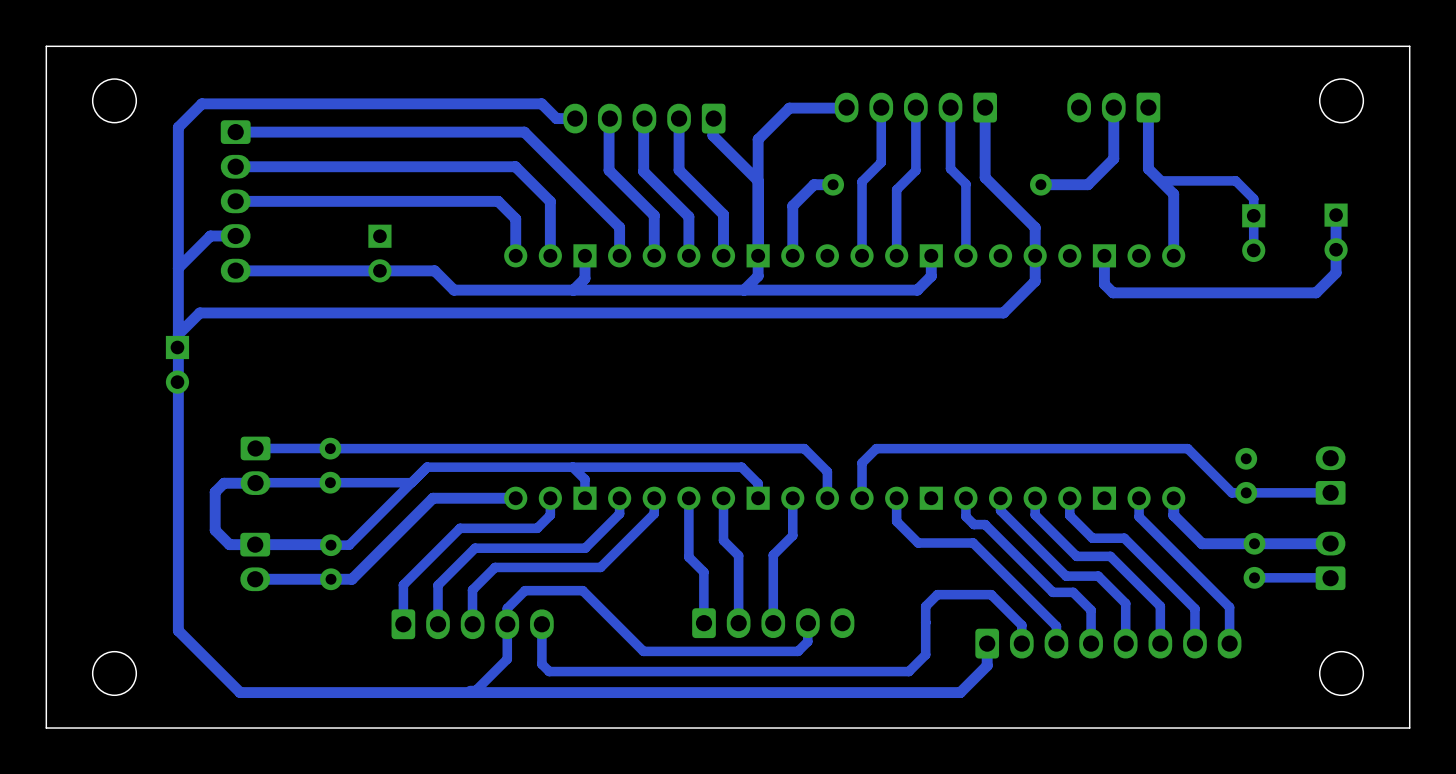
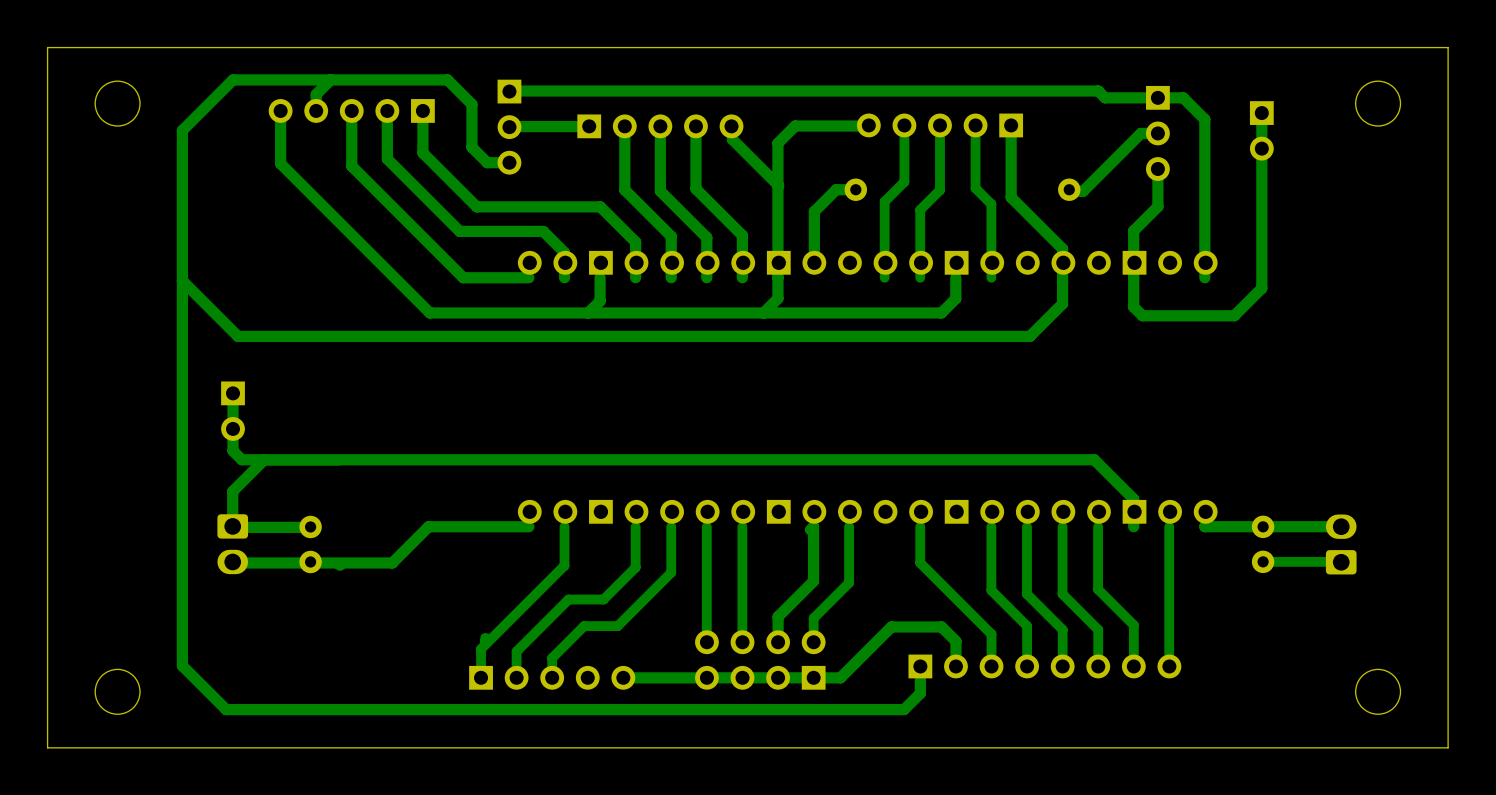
track: none -> (330, 79) (316, 94) (316, 110)
track: none -> (509, 91) (1098, 90) (1105, 97) (1183, 97) (1204, 119) (1204, 277)
part footprint: [563, 103, 726, 134] -> [577, 114, 744, 139]
track: (846, 107) (789, 108) (758, 139) (758, 276) (744, 290) -> none
track: (881, 107) (881, 162) (862, 181) (862, 255) -> (904, 125) (904, 181) (884, 201) (884, 277)
track: (915, 107) (915, 170) (896, 189) (896, 255) -> (939, 125) (939, 190) (920, 209) (920, 277)
part: (915, 107) -> none
track: (950, 107) (950, 168) (965, 184) (965, 255) -> (975, 125) (975, 188) (991, 204) (991, 277)
track: (985, 107) (985, 177) (1035, 227) (1035, 281) (1003, 312) (199, 312) (178, 334) -> none
track: (1113, 107) (1113, 158) (1087, 184) (1040, 184) -> none
part: (1113, 107) -> none
track: (1148, 107) (1148, 168) (1173, 194) (1173, 255) -> none
track: none -> (280, 110) (280, 163) (429, 312) (941, 312) (955, 298) (955, 277)
track: none -> (351, 110) (351, 166) (463, 277) (528, 277)
part: none -> (351, 110)
track: none -> (387, 110) (387, 159) (459, 231) (543, 231) (564, 252) (564, 277)
track: none -> (422, 110) (422, 152) (476, 206) (600, 206) (635, 242) (635, 277)
track: none -> (1261, 113) (1261, 288) (1234, 315) (1142, 315) (1133, 306) (1133, 230) (1157, 206) (1157, 169)
track: (575, 118) (556, 118) (541, 103) (201, 103) (178, 127) (178, 630) (240, 692) (960, 692) (987, 665) (987, 643) -> none
track: (609, 118) (609, 170) (654, 215) (654, 255) -> none
track: (644, 118) (643, 171) (688, 216) (688, 255) -> none
track: (679, 118) (679, 170) (723, 214) (723, 255) -> none
track: none -> (868, 125) (795, 126) (777, 143) (777, 298) (763, 312)
part: none -> (939, 125)
track: none -> (1011, 125) (1011, 197) (1062, 248) (1062, 303) (1029, 336) (238, 336) (182, 280)
part: none -> (509, 127)
track: none -> (589, 126) (509, 127)
track: none -> (624, 126) (624, 189) (671, 236) (671, 277)
track: none -> (660, 126) (660, 191) (706, 237) (706, 277)
track: none -> (695, 126) (695, 188) (742, 235) (742, 277)
part: none -> (1261, 130)
track: none -> (1157, 133) (1140, 133) (1083, 191) (1068, 191)
part: none -> (1157, 133)
track: (235, 132) (524, 132) (619, 227) (619, 255) -> none
track: none -> (509, 162) (487, 162) (471, 147) (471, 104) (447, 79) (233, 79) (182, 130) (182, 665) (226, 709) (904, 709) (920, 693) (920, 666)
track: (235, 166) (515, 166) (550, 201) (550, 255) -> none
track: (1160, 180) (1235, 180) (1253, 198) (1253, 250) -> none
track: (235, 201) (498, 201) (515, 218) (515, 255) -> none
part: (235, 201) -> none
track: (1336, 215) (1336, 272) (1316, 292) (1113, 292) (1104, 284) (1104, 255) -> none
part: (1336, 232) -> none
part: (1253, 233) -> none
track: (235, 236) (210, 236) (178, 268) -> none
part: (379, 253) -> none
track: (584, 255) (584, 278) (573, 290) -> (600, 277) (600, 301) (588, 312)
track: (931, 255) (931, 276) (917, 290) (454, 290) (434, 270) (235, 270) -> none
part position: (177, 364) -> (233, 411)
track: none -> (233, 393) (233, 450) (241, 459) (1094, 459) (1133, 499) (1133, 526)
track: none -> (264, 459) (232, 491) (232, 526)
track: (330, 448) (804, 448) (827, 471) (827, 498) (829, 500) -> none
part: (255, 465) -> none
part: (330, 465) -> none
track: (572, 467) (584, 479) (584, 498) -> none
part: (1246, 475) -> none
part: (1330, 475) -> none
track: (411, 482) (255, 483) -> none
track: (255, 483) (224, 483) (215, 492) (215, 530) (229, 544) (330, 544) -> none
track: (1330, 492) (1231, 492) (1187, 448) (876, 448) (862, 462) (862, 498) -> none
track: (515, 498) (433, 498) (351, 579) (255, 579) -> none
track: (550, 498) (550, 515) (537, 528) (460, 528) (403, 584) (403, 624) -> none
track: (619, 498) (619, 513) (585, 548) (475, 548) (438, 585) (438, 624) -> none
track: (654, 498) (654, 513) (600, 567) (495, 567) (472, 590) (472, 620) -> none
track: (688, 498) (688, 557) (703, 572) (703, 623) -> none
track: (723, 498) (723, 540) (738, 555) (738, 623) -> none
track: (758, 498) (758, 483) (741, 467) (427, 467) (349, 545) (331, 545) -> none
track: (896, 498) (896, 521) (918, 543) (973, 543) (1056, 626) (1056, 643) -> none
track: (965, 498) (965, 516) (973, 524) (985, 524) (1052, 592) (1073, 592) (1091, 610) (1091, 643) -> none
track: (1000, 498) (1000, 510) (1066, 576) (1098, 576) (1125, 603) (1125, 643) -> none
track: (1035, 498) (1035, 514) (1076, 556) (1110, 556) (1160, 606) (1160, 643) -> none
track: (1069, 498) (1069, 515) (1092, 538) (1124, 538) (1194, 608) (1194, 643) -> none
track: (1139, 498) (1139, 516) (1229, 607) (1229, 643) -> none
track: (1173, 498) (1173, 515) (1202, 543) (1330, 543) -> none
track: (789, 501) (792, 498) (792, 535) (773, 555) (773, 623) -> none
track: none -> (528, 526) (428, 526) (392, 562) (232, 562)
track: none -> (564, 526) (564, 565) (481, 649) (481, 677)
track: none -> (635, 526) (635, 567) (603, 599) (568, 599) (516, 651) (516, 677)
track: none -> (671, 526) (671, 572) (617, 626) (584, 626) (552, 658) (552, 677)
track: none -> (706, 526) (706, 641)
track: none -> (742, 526) (742, 641)
track: none -> (849, 526) (849, 582) (813, 618) (813, 642)
track: none -> (920, 526) (920, 562) (991, 634) (991, 666)
track: none -> (991, 526) (991, 590) (1027, 626) (1027, 666)
track: none -> (1026, 526) (1026, 594) (1062, 629) (1062, 666)
track: none -> (1062, 526) (1062, 594) (1098, 629) (1098, 666)
track: none -> (1098, 526) (1098, 589) (1133, 625) (1133, 666)
track: none -> (1169, 526) (1169, 666)
track: none -> (1341, 526) (1204, 526)
track: none -> (311, 527) (232, 527)
track: none -> (810, 529) (813, 526) (813, 581) (778, 616) (778, 642)
part: none -> (232, 544)
part: none -> (1263, 544)
part: none -> (310, 544)
part: none -> (1341, 544)
part: (1254, 560) -> none
part: (1330, 560) -> none
part: (255, 561) -> none
part: (331, 562) -> none
track: (1254, 577) (1330, 578) -> (1263, 561) (1341, 562)
part: (773, 623) -> none
track: (807, 623) (807, 641) (798, 651) (643, 651) (582, 590) (525, 590) (507, 608) (507, 659) (475, 690) (470, 690) -> none
part: (472, 624) -> none
track: (541, 624) (541, 664) (549, 671) (908, 671) (925, 654) (925, 606) (937, 594) (991, 594) (1021, 625) (1021, 643) -> none
part: none -> (760, 660)
part: (1108, 643) -> none
track: none -> (955, 666) (955, 641) (941, 626) (891, 626) (840, 677) (623, 677)
part: none -> (1044, 666)
part: none -> (552, 677)

